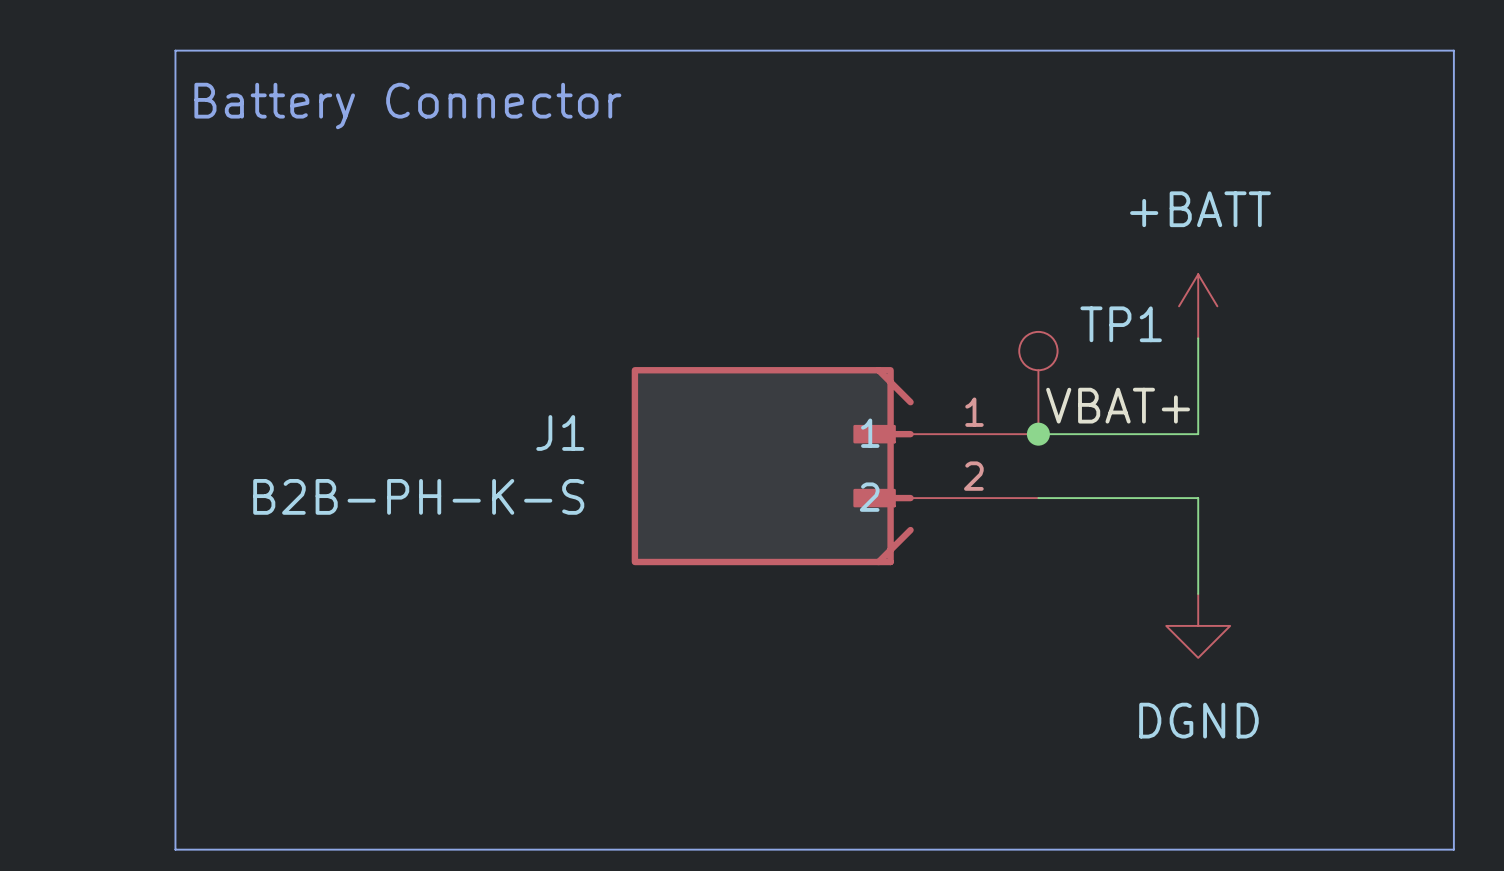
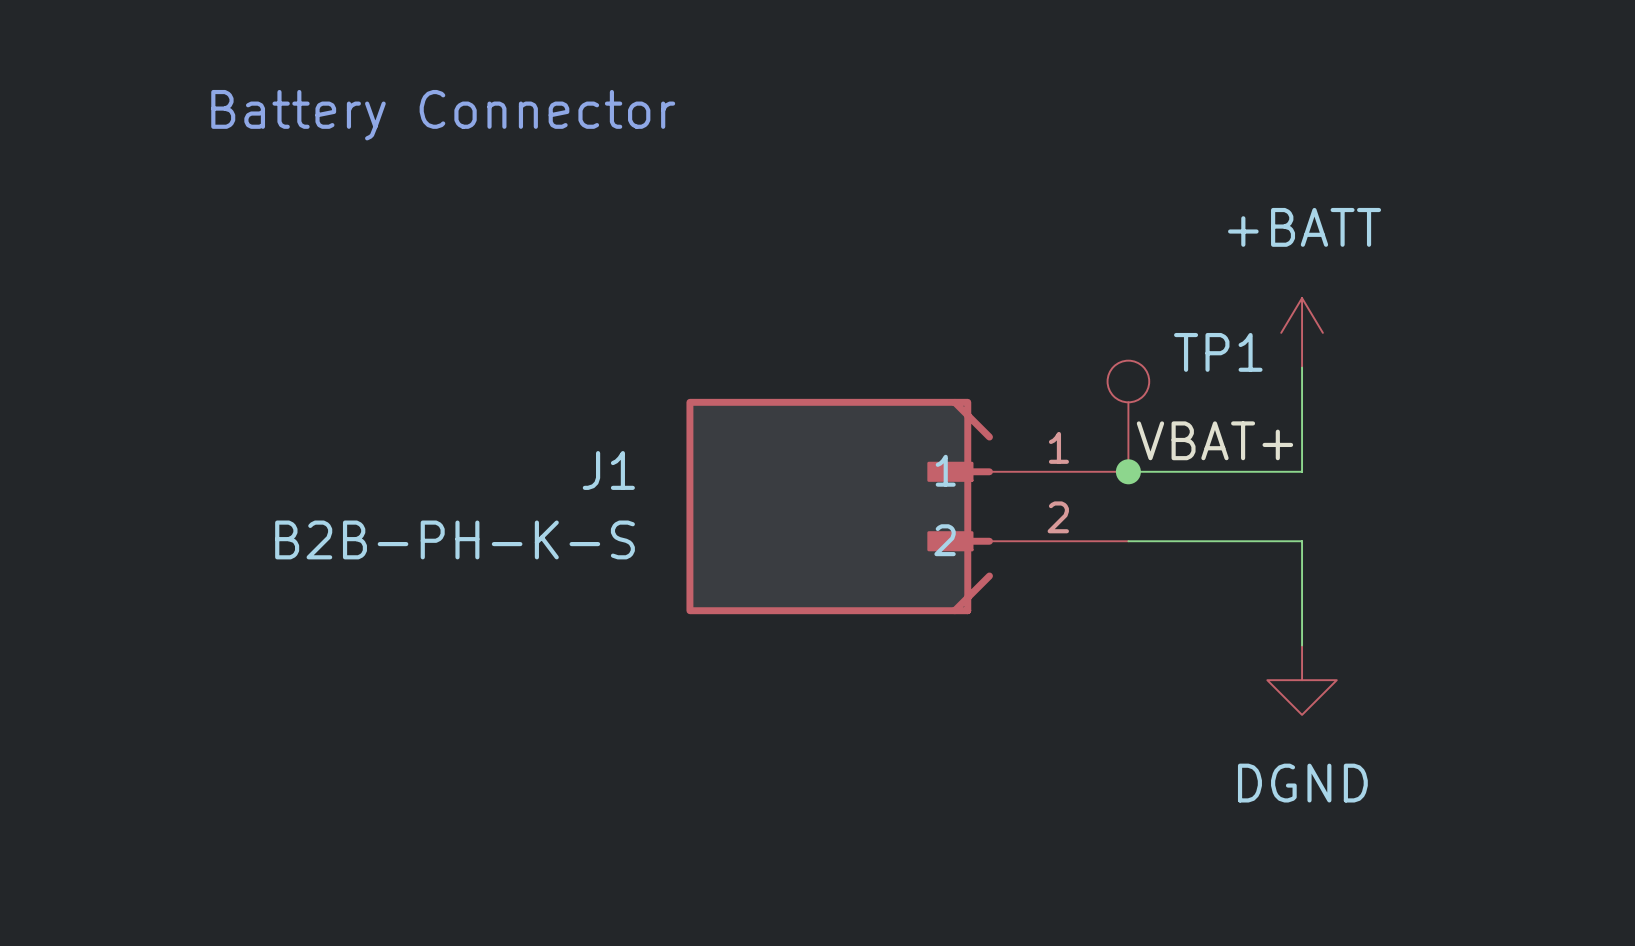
line: (175, 50) (1453, 50) (1453, 849) (175, 849) (175, 50) -> none

